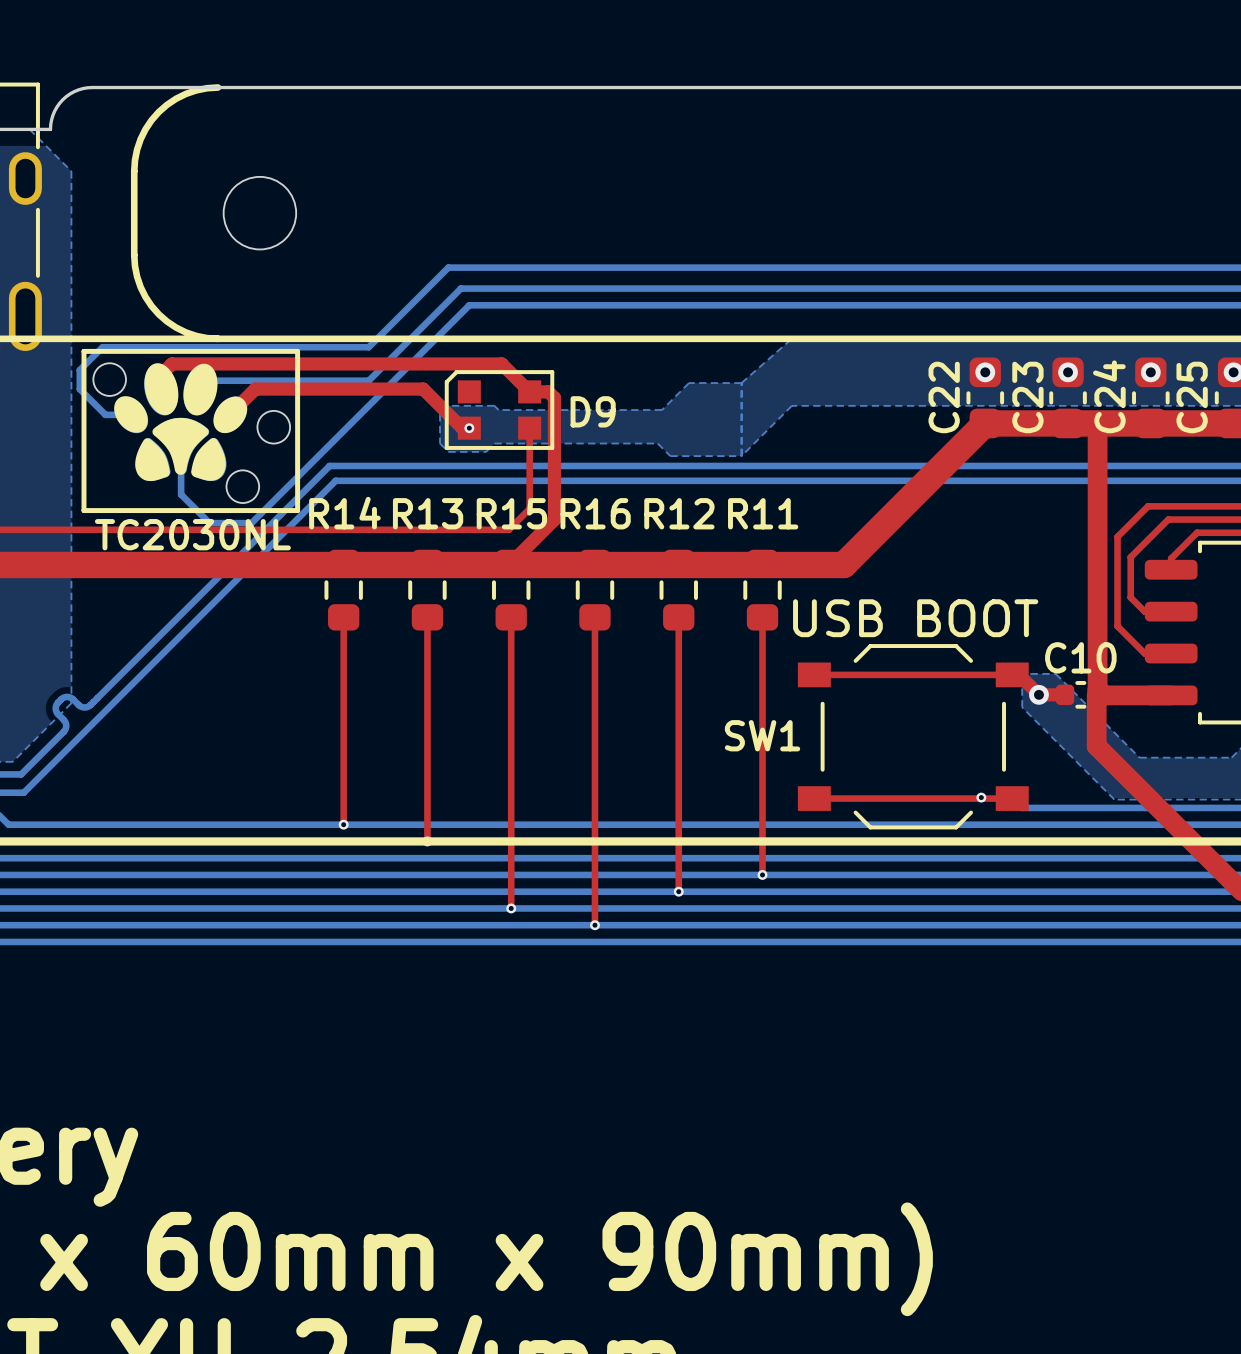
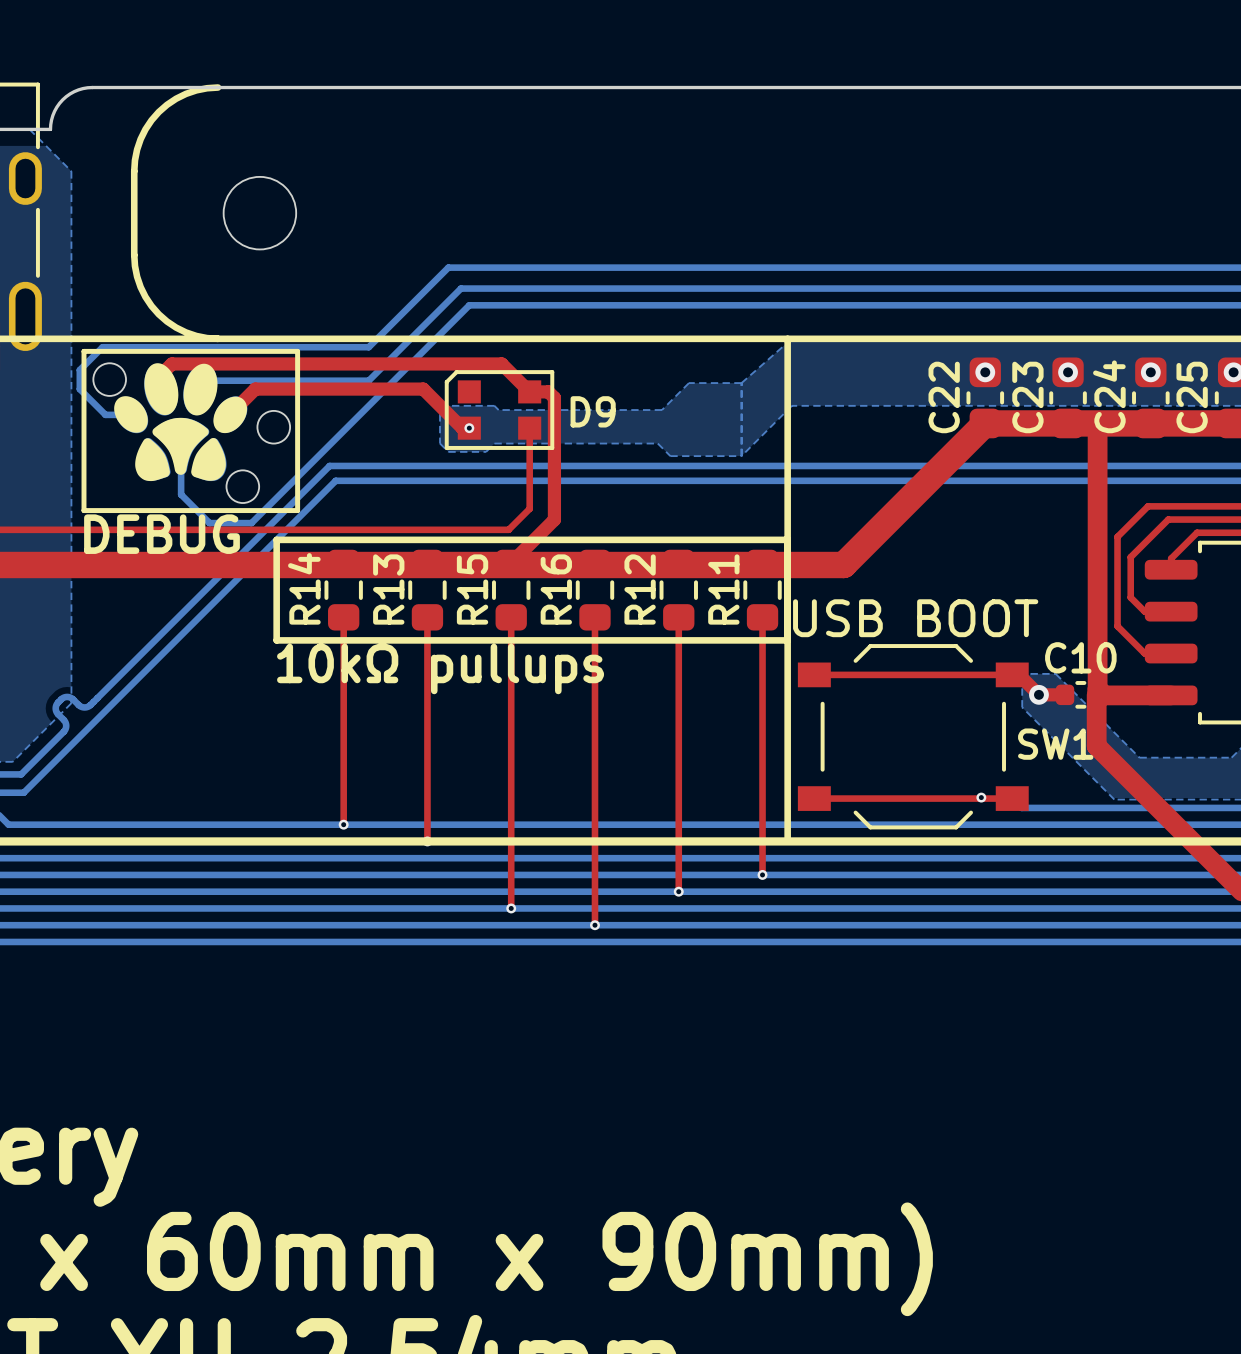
line: none -> (787, 338) (787, 841)
R14 name rotation: 0° (344, 513) -> 90° counterclockwise (304, 588)
R13 name rotation: 0° (428, 513) -> 90° counterclockwise (388, 589)
R15 name rotation: 0° (511, 513) -> 90° counterclockwise (472, 589)
R16 name rotation: 0° (595, 513) -> 90° counterclockwise (556, 589)
R12 name rotation: 0° (679, 513) -> 90° counterclockwise (640, 589)
R11 name rotation: 0° (763, 513) -> 90° counterclockwise (723, 589)
text: TC2030NL (192, 534) -> DEBUG (162, 534)
line: none -> (787, 539) (276, 539) (276, 640) (787, 640)
text: none -> 10kΩ pullups (440, 668)
SW1 name position: SW1 (762, 735) -> SW1 (1055, 744)

